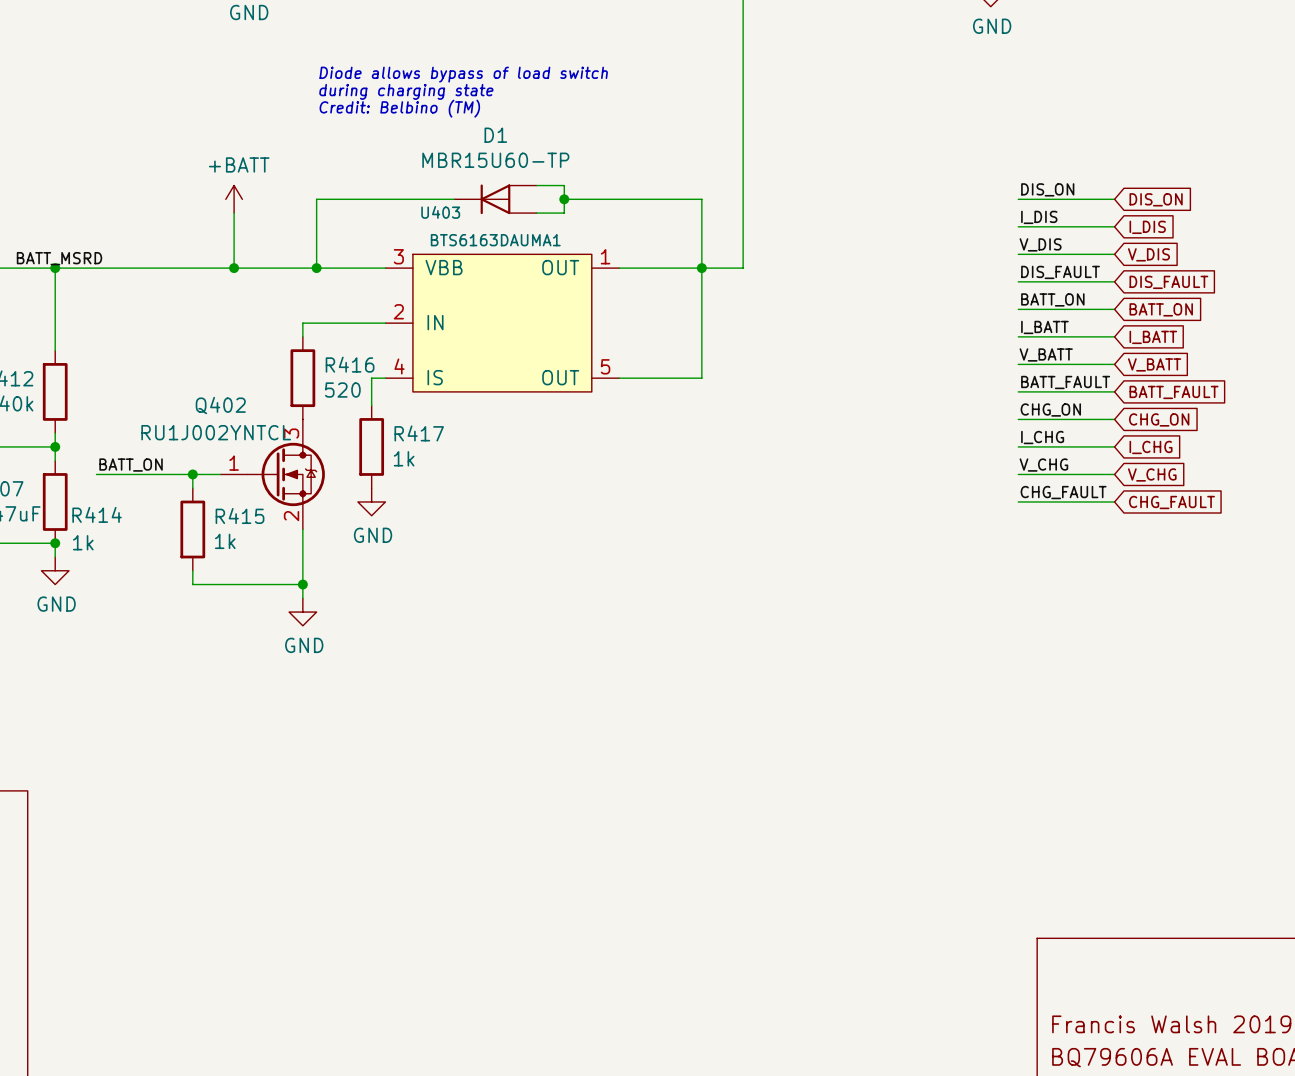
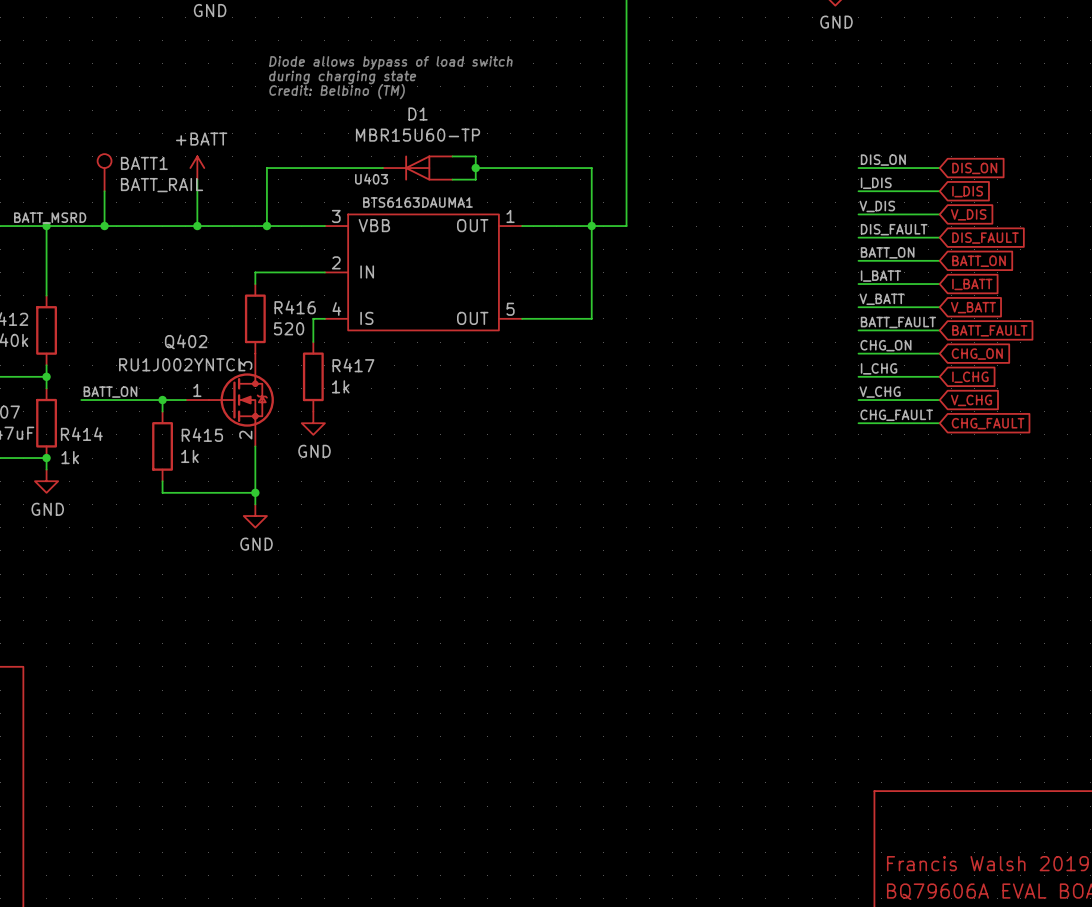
BATT1: none -> BATT_RAIL (104, 172)
wire: none -> (104, 191) (104, 226)
junction: none -> (104, 226)

